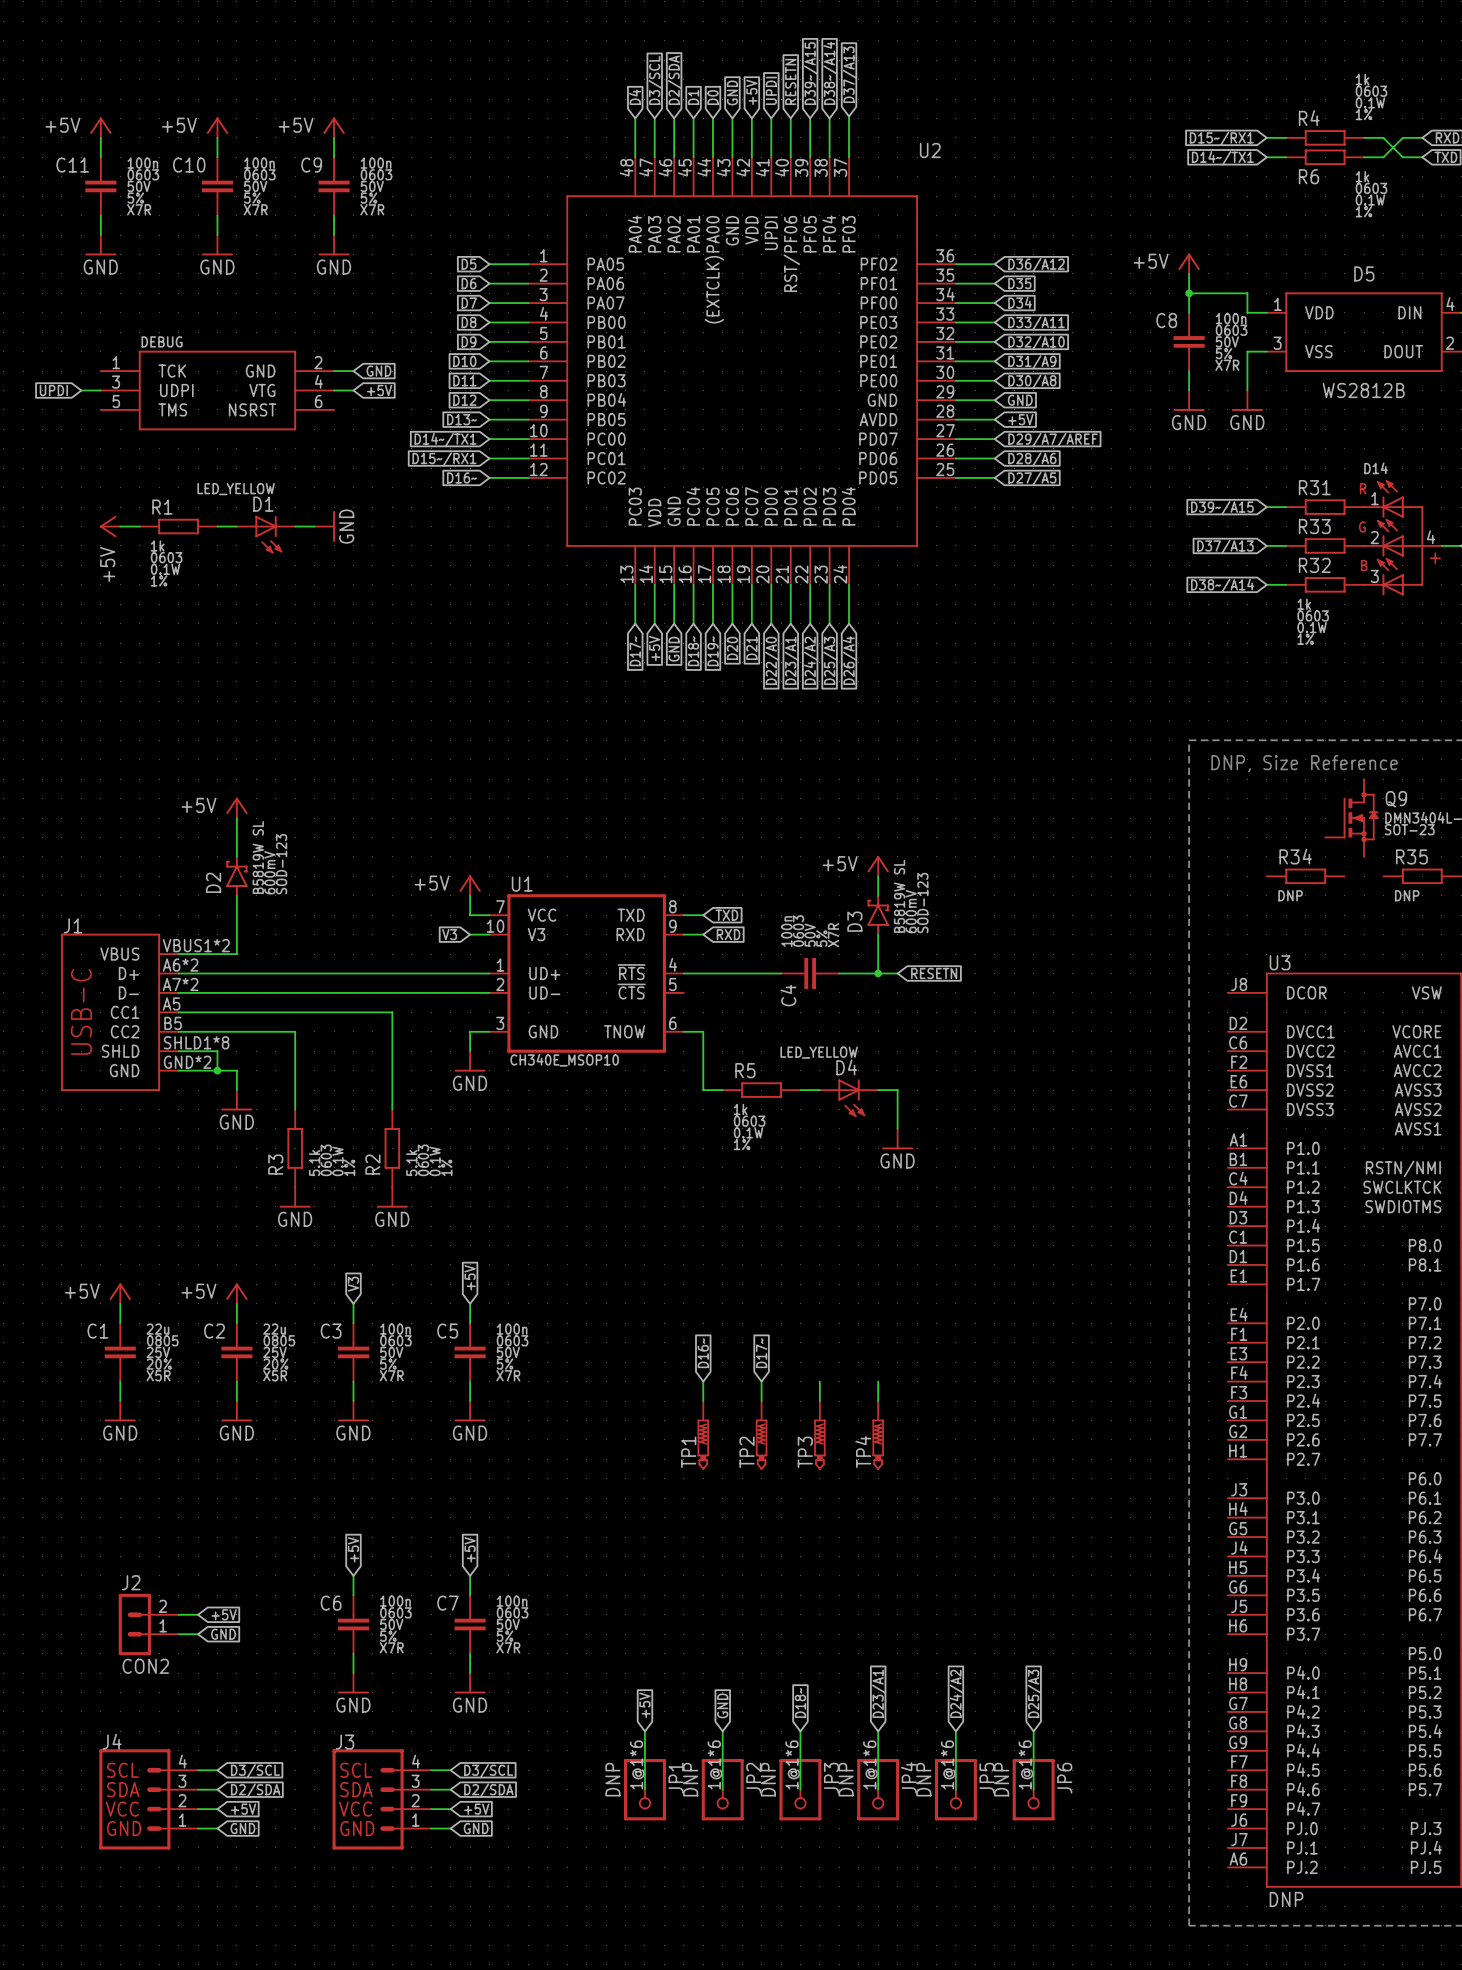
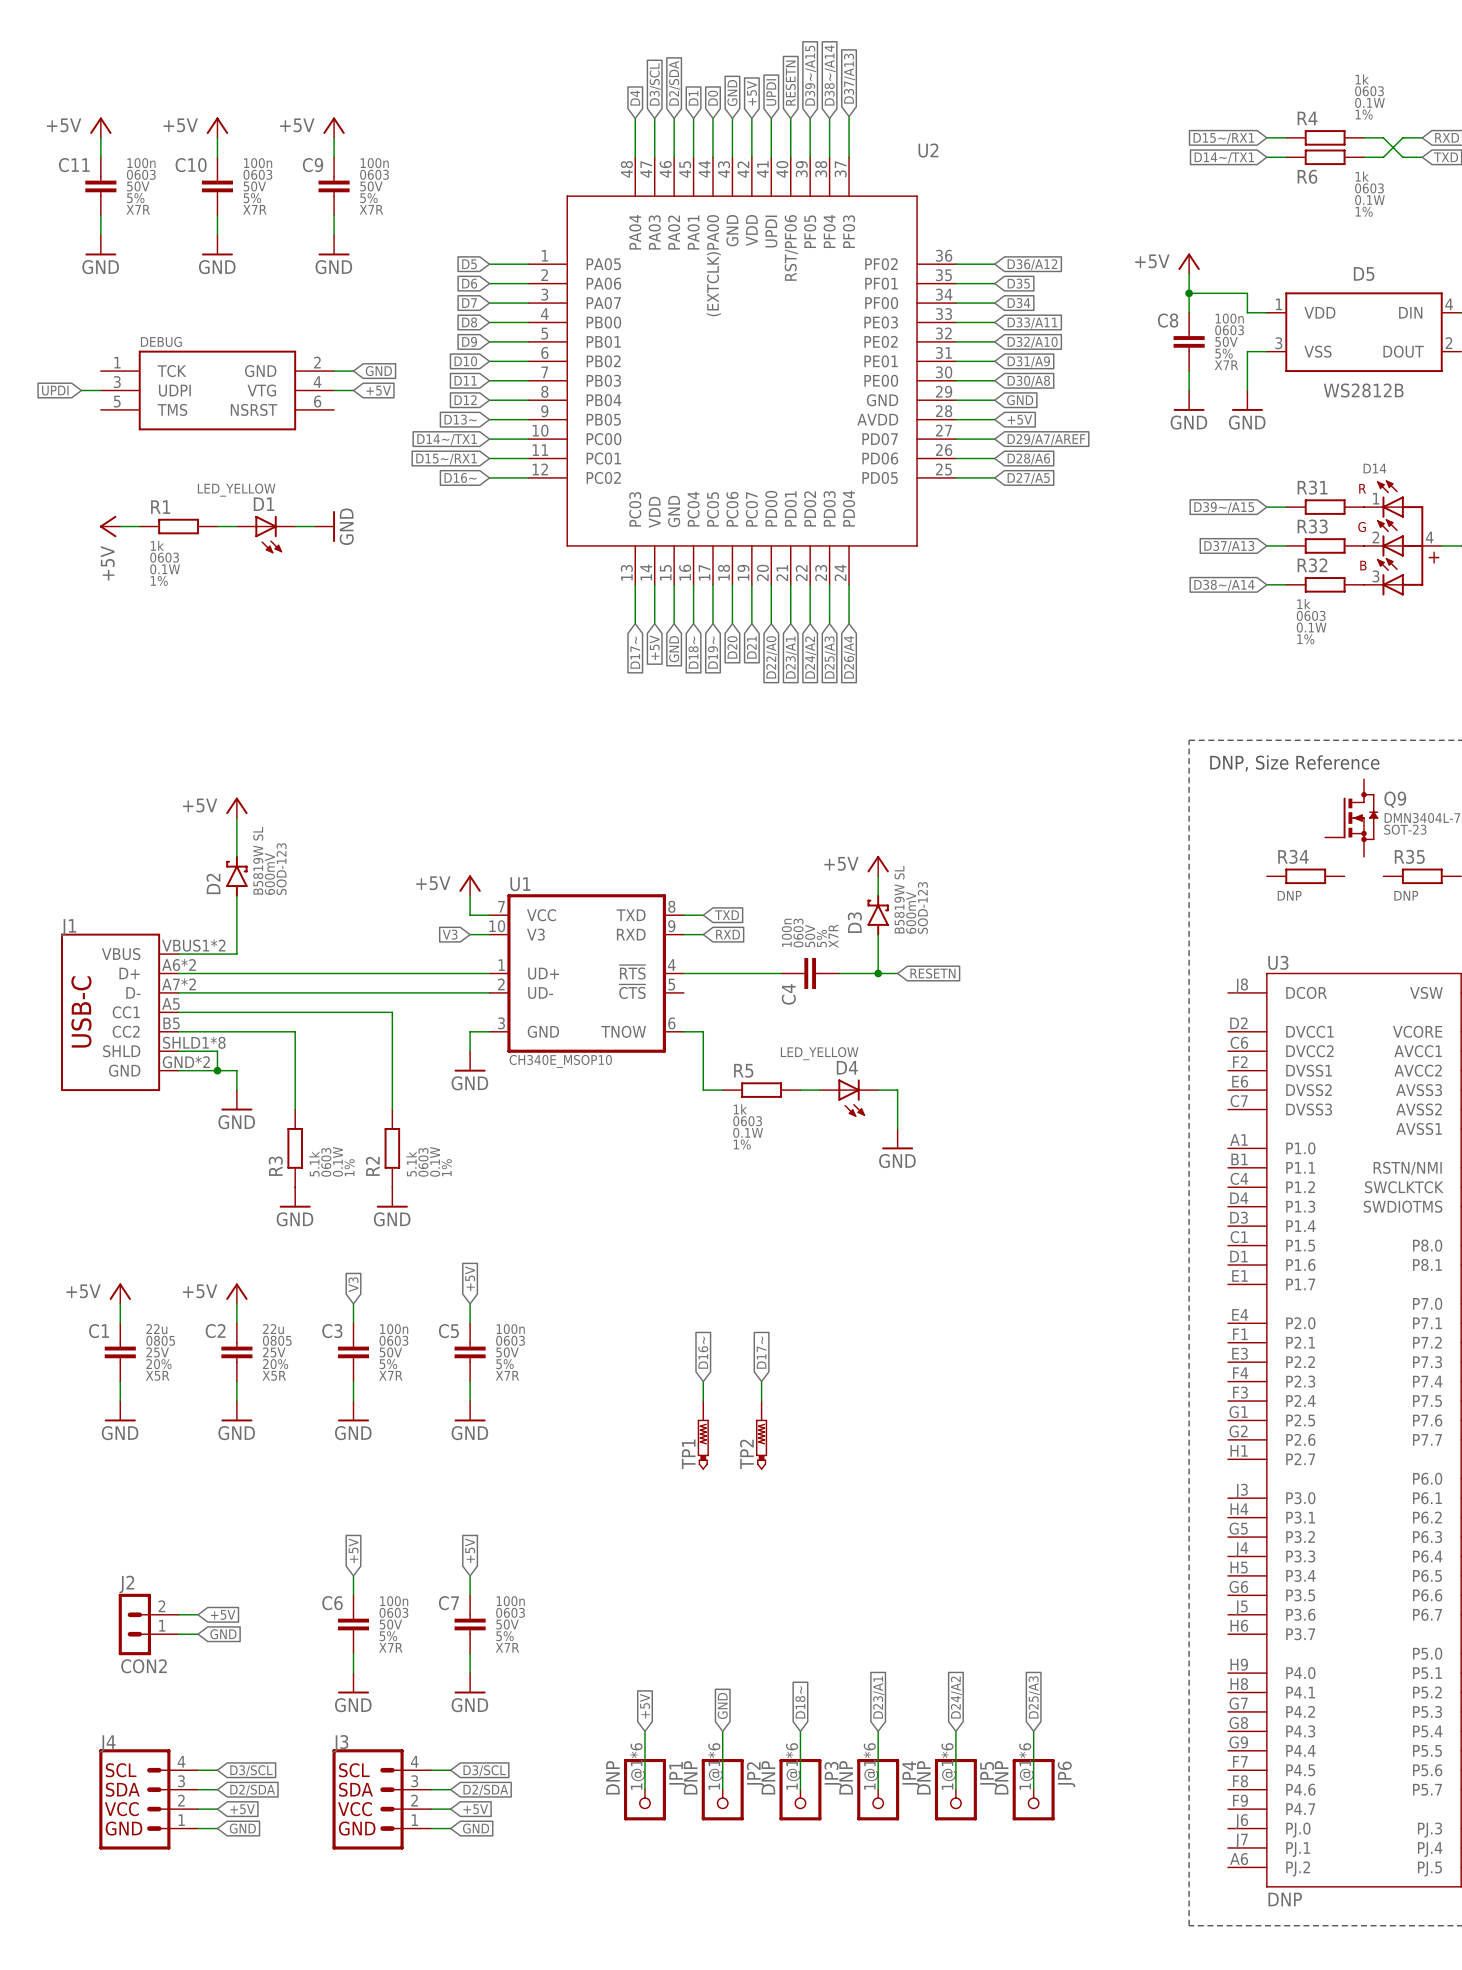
wire: (819, 1381) (819, 1401) -> none
wire: (878, 1381) (878, 1401) -> none
TP3: (819, 1435) -> none
TP4: (878, 1435) -> none

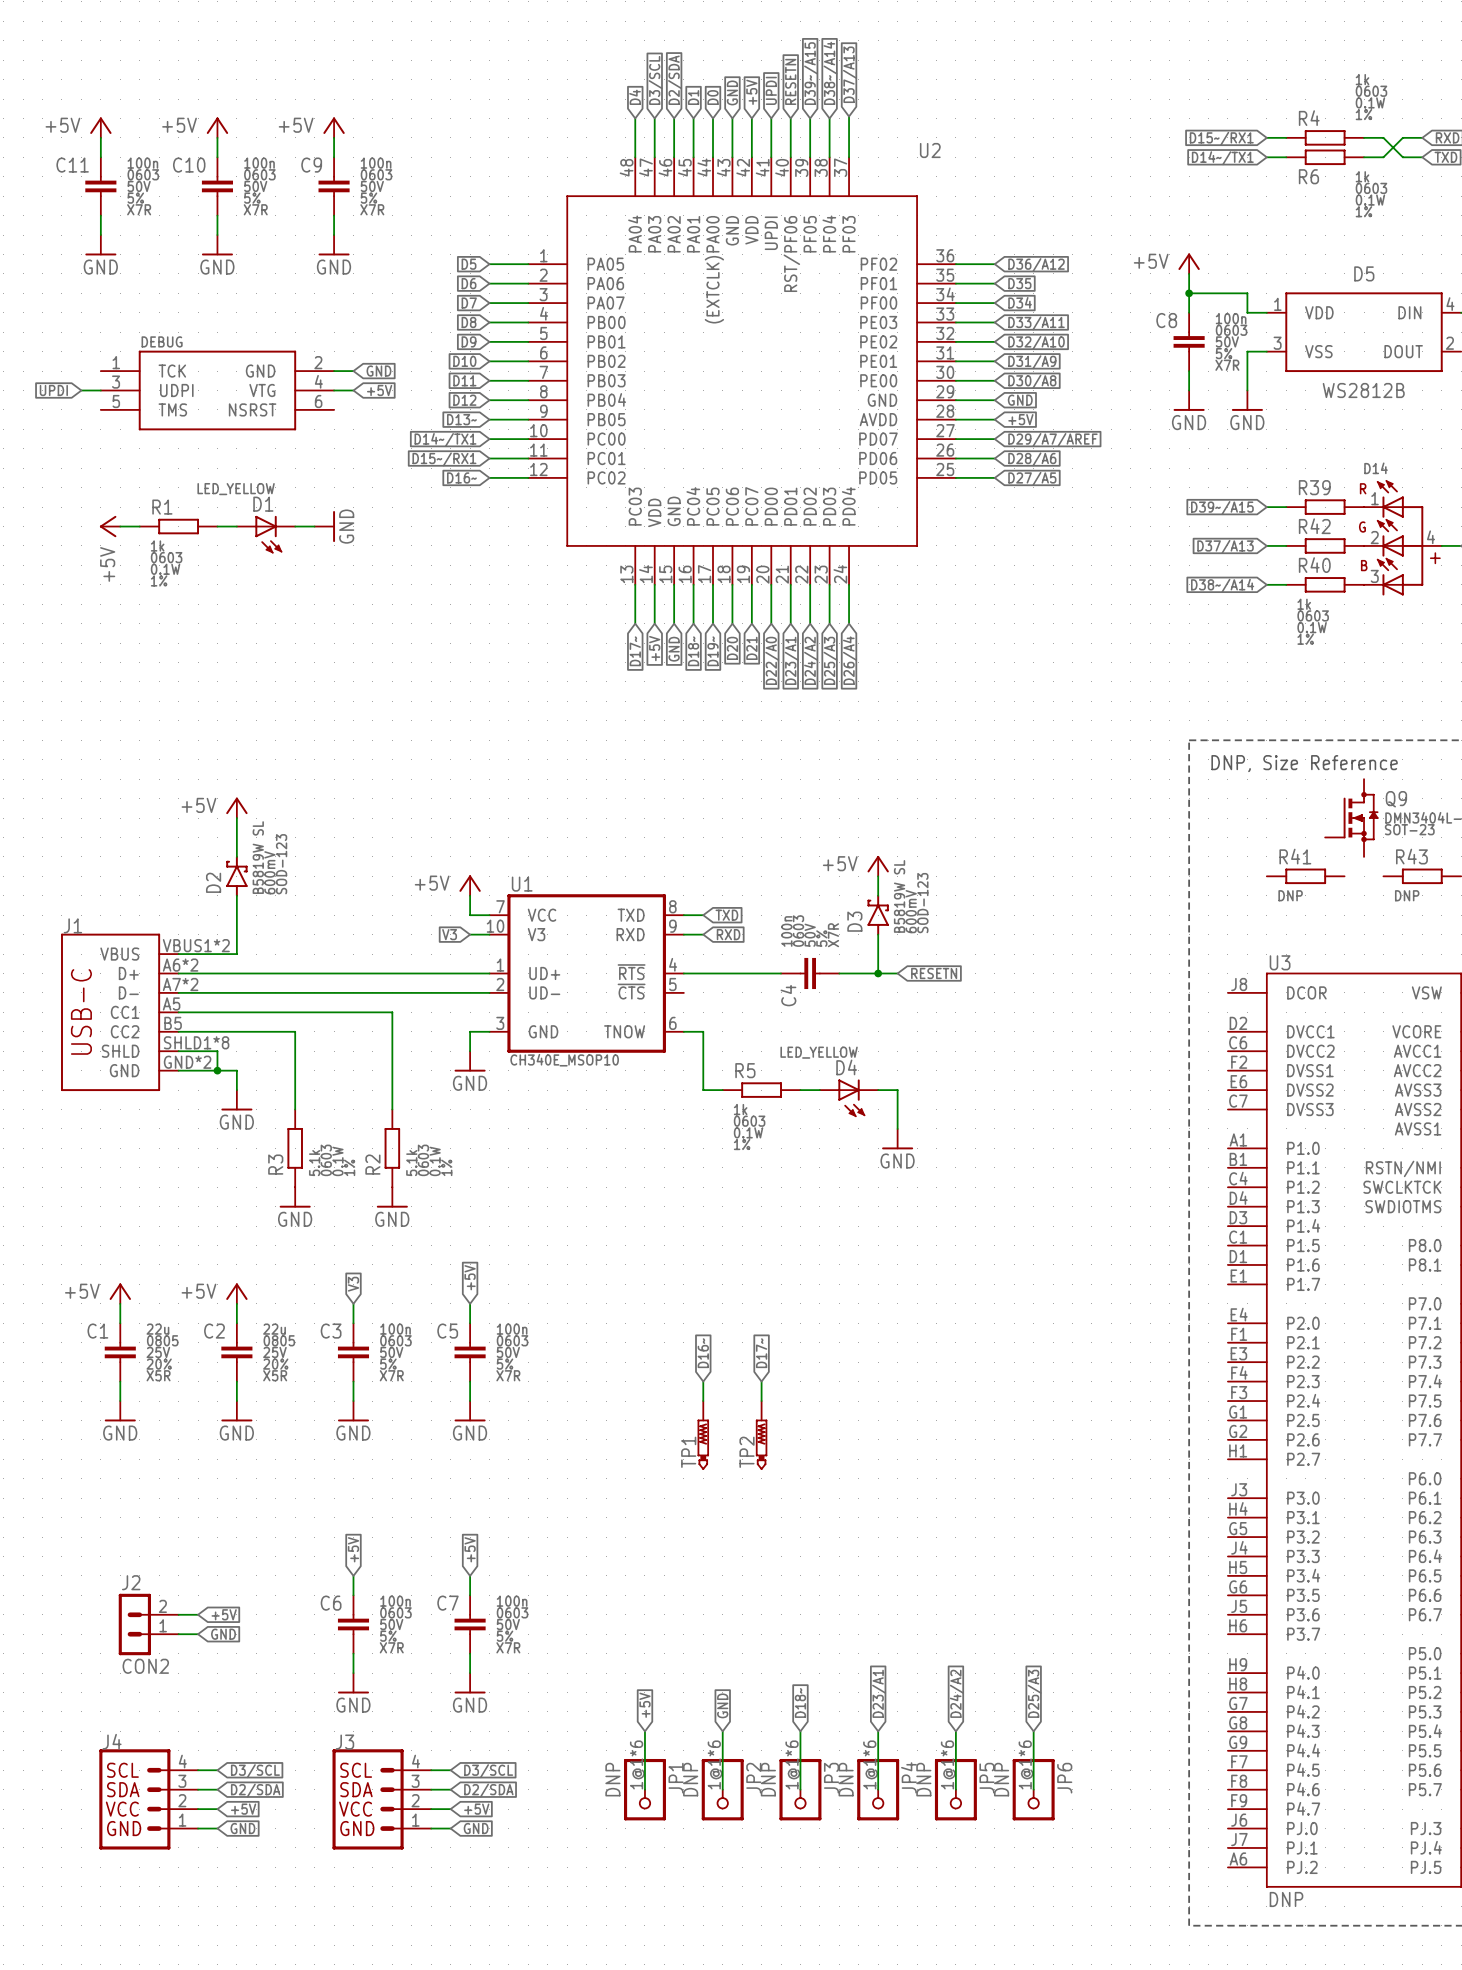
R31 name: R31 (1312, 487) -> R39 (1314, 487)
R33 name: R33 (1312, 526) -> R42 (1314, 526)
R32 name: R32 (1312, 565) -> R40 (1314, 565)
R34 name: R34 (1293, 856) -> R41 (1295, 856)
R35 name: R35 (1409, 856) -> R43 (1411, 856)

